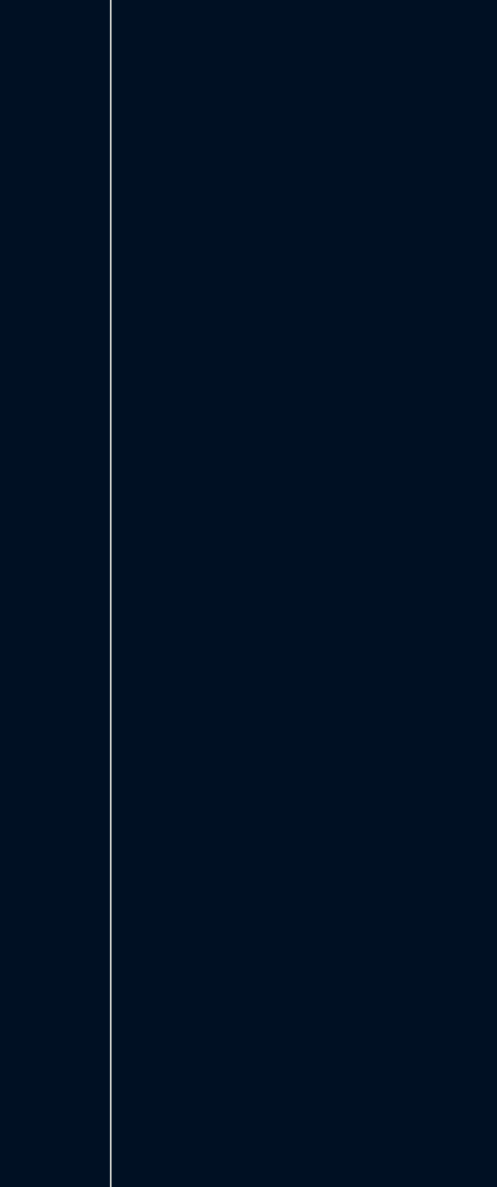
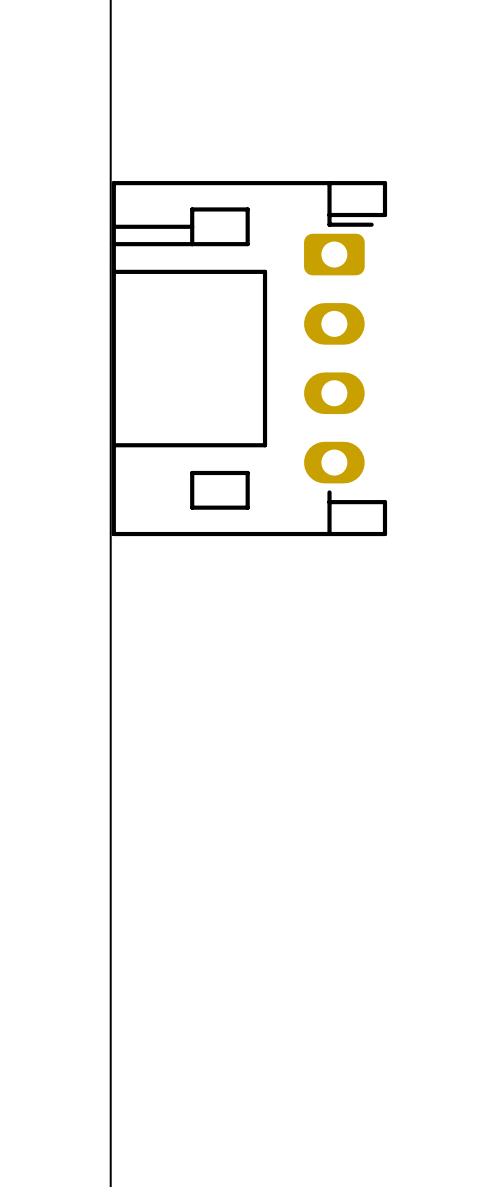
part: none -> (249, 358)

